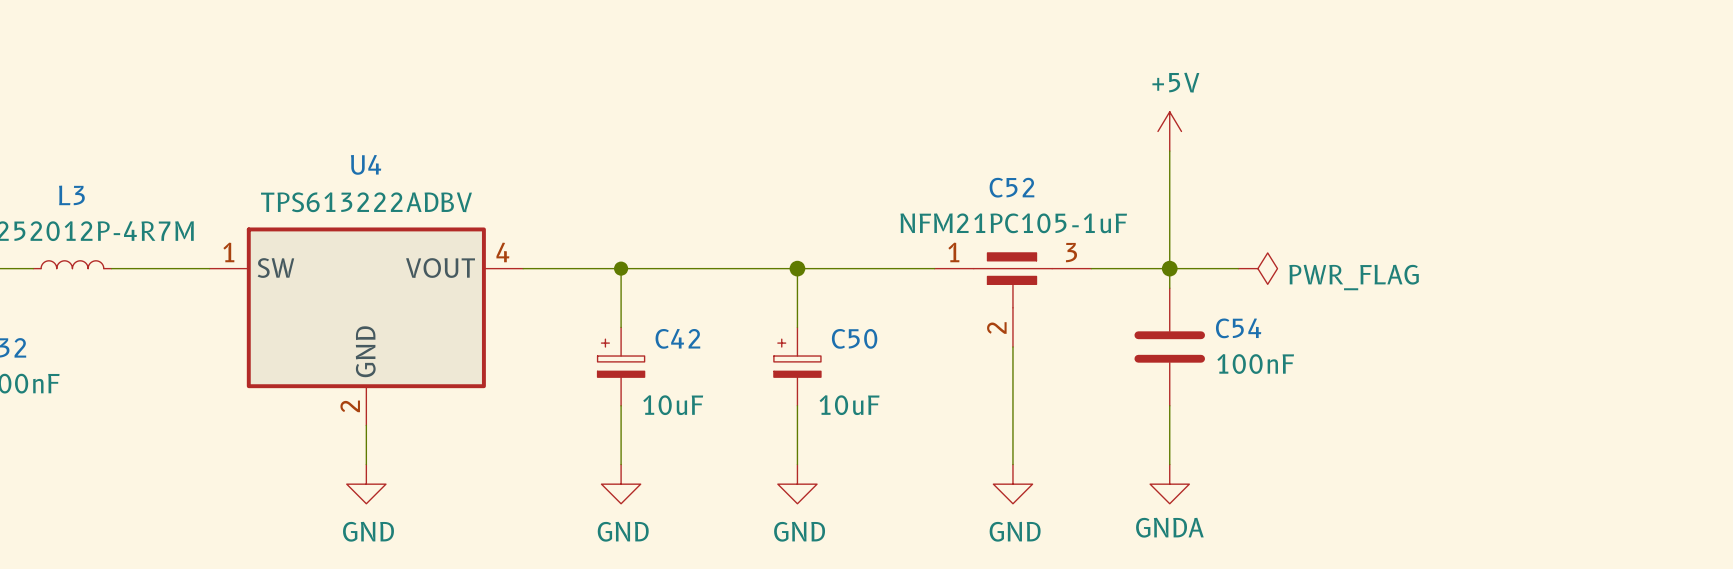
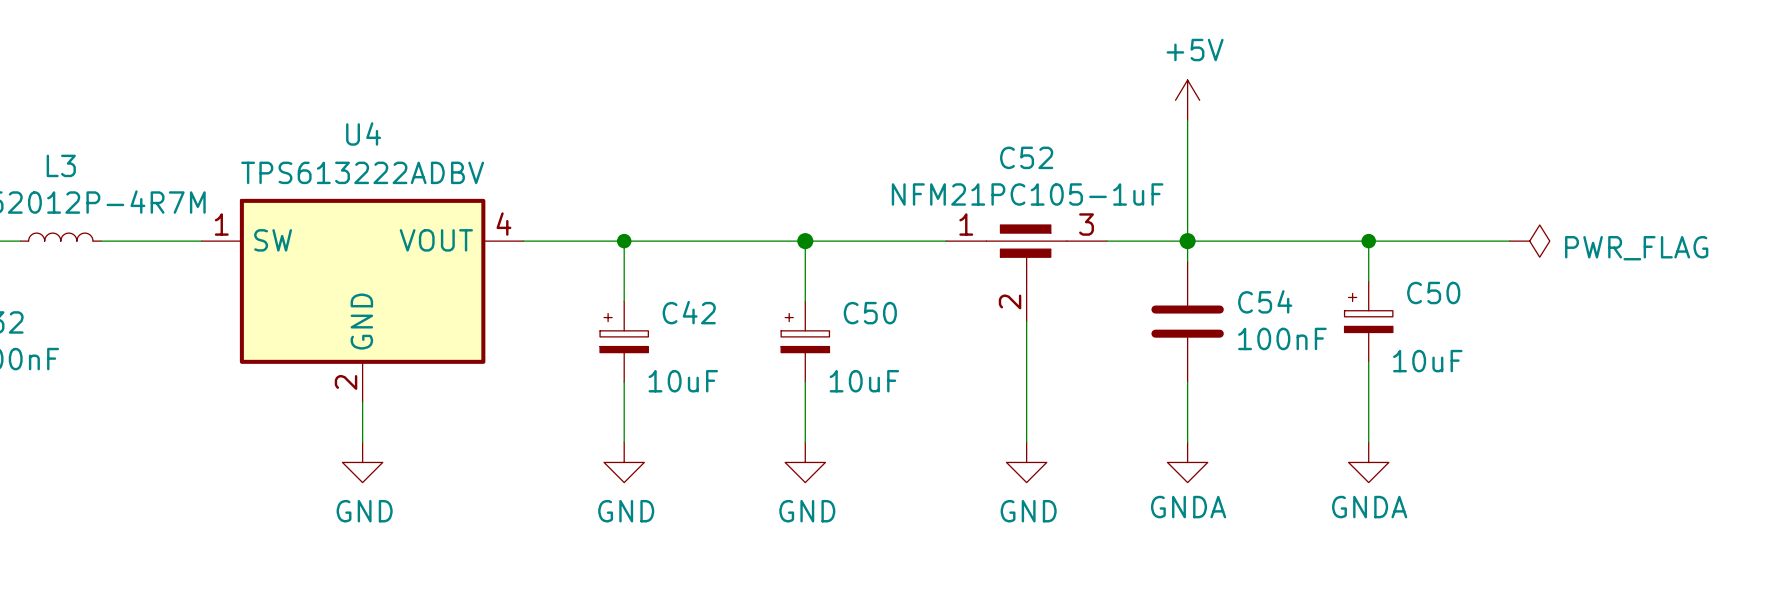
wire: none -> (1258, 241) (1509, 241)
power symbol position: PWR_FLAG (1257, 268) -> PWR_FLAG (1529, 241)
wire: none -> (1368, 241) (1368, 281)
junction: none -> (1368, 241)
C50: none -> 10uF (1368, 321)
wire: none -> (1368, 361) (1368, 442)
power symbol: none -> GNDA (1368, 462)

